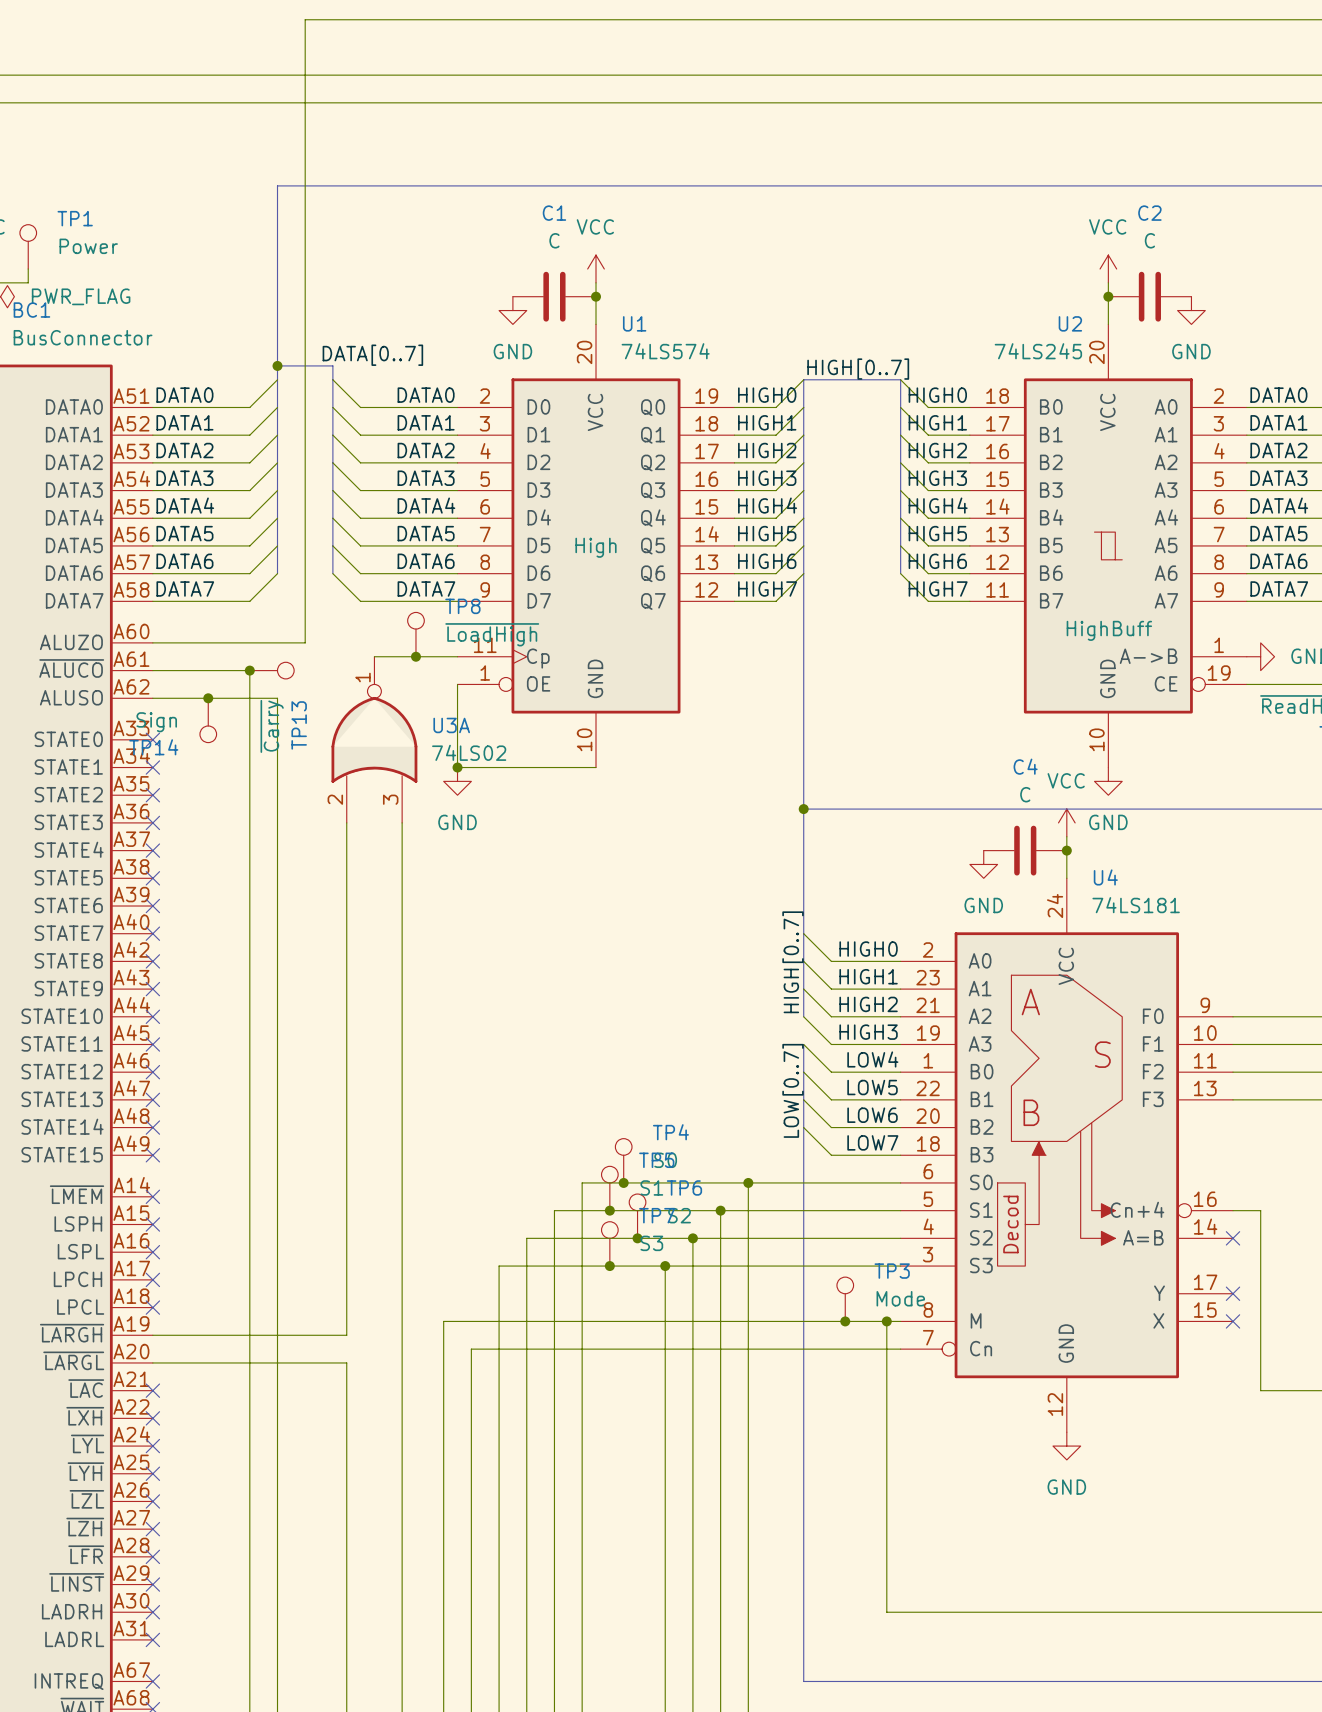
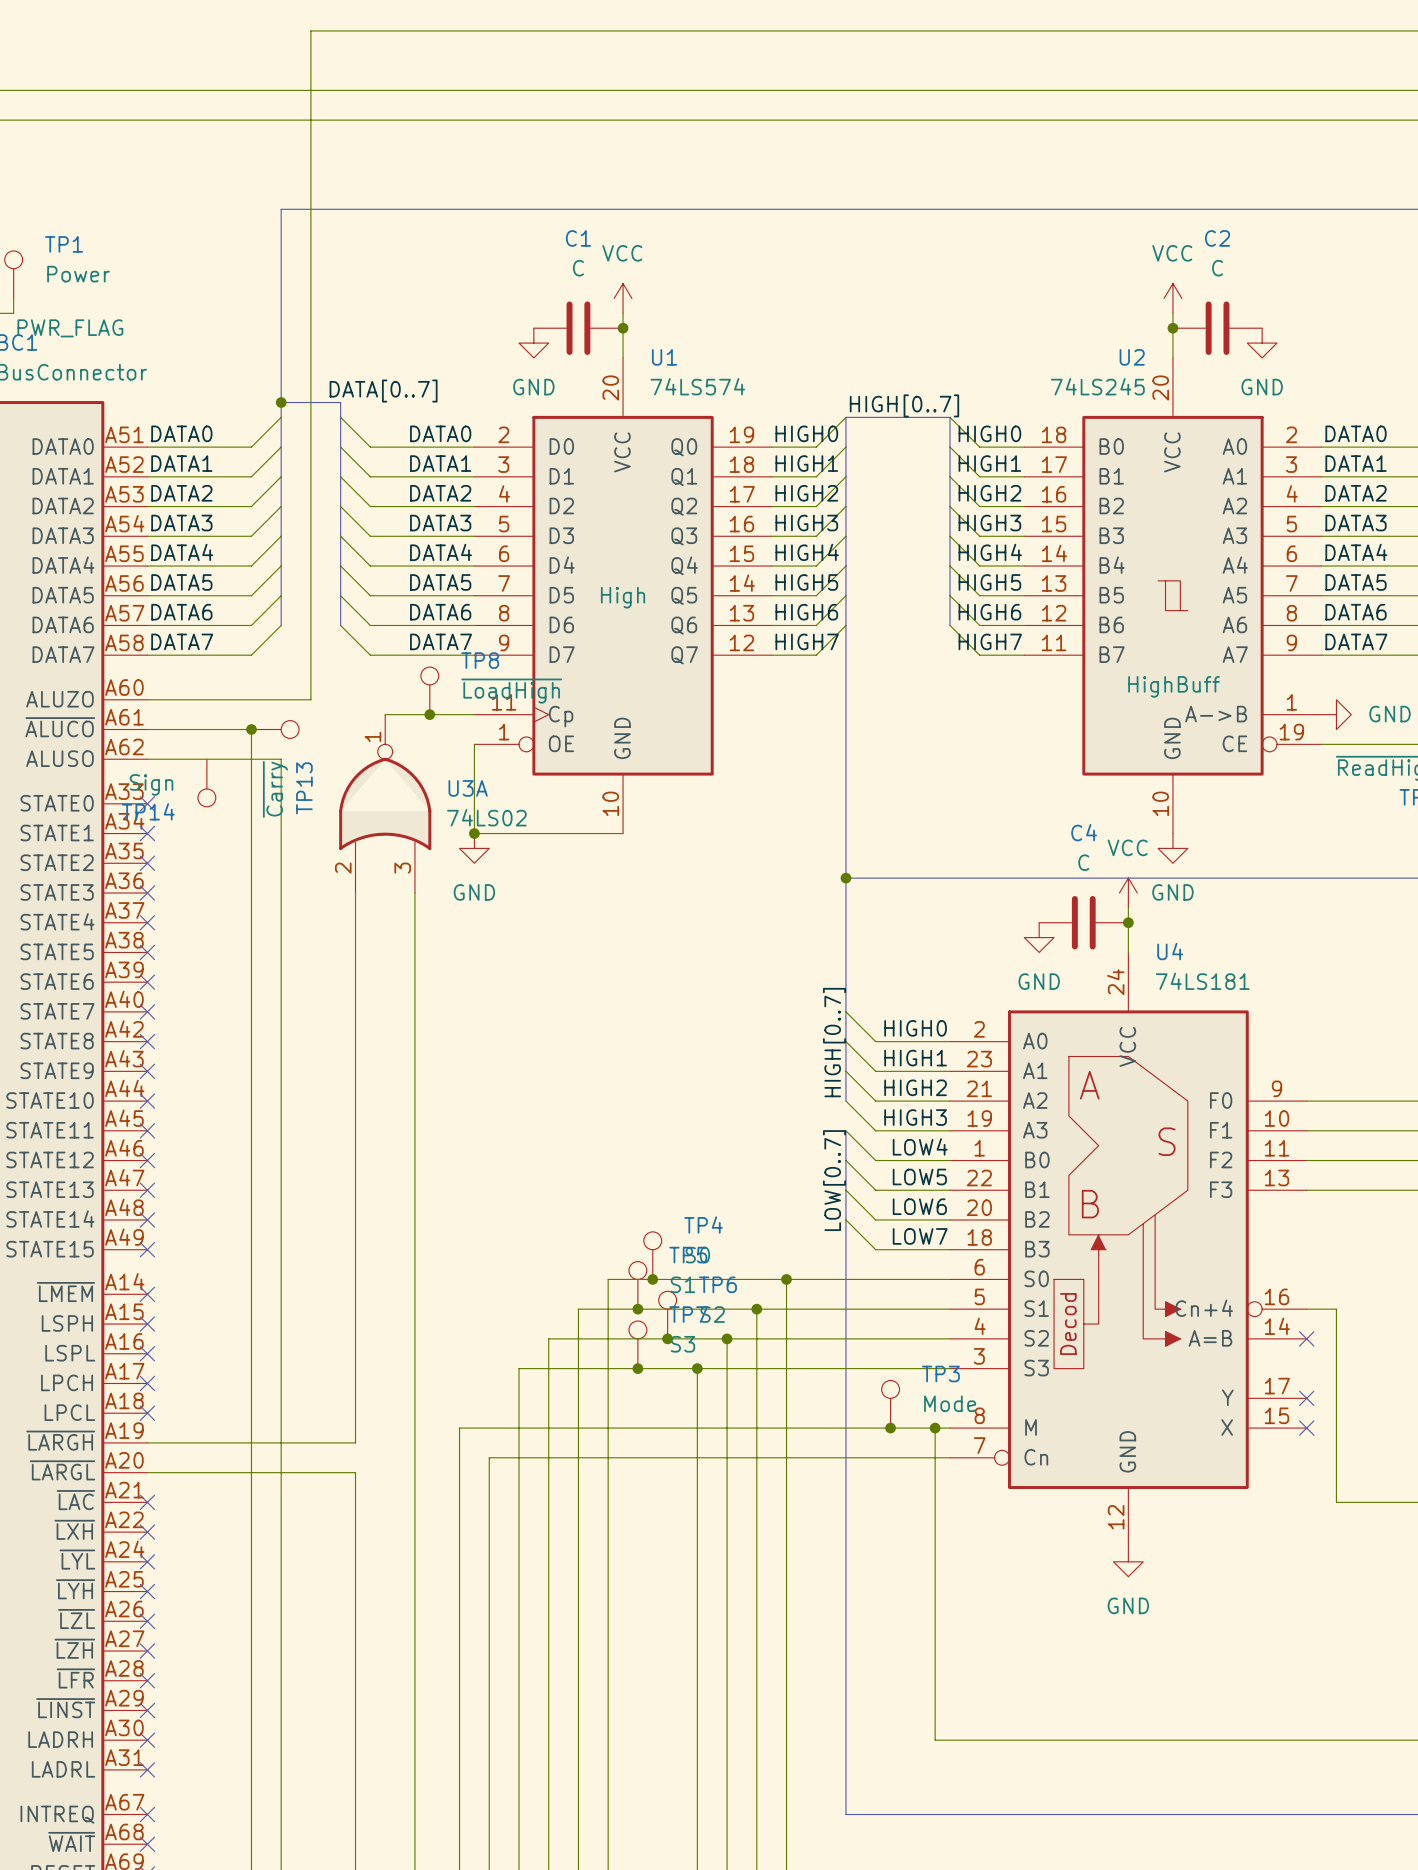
junction: (208, 698) -> none

